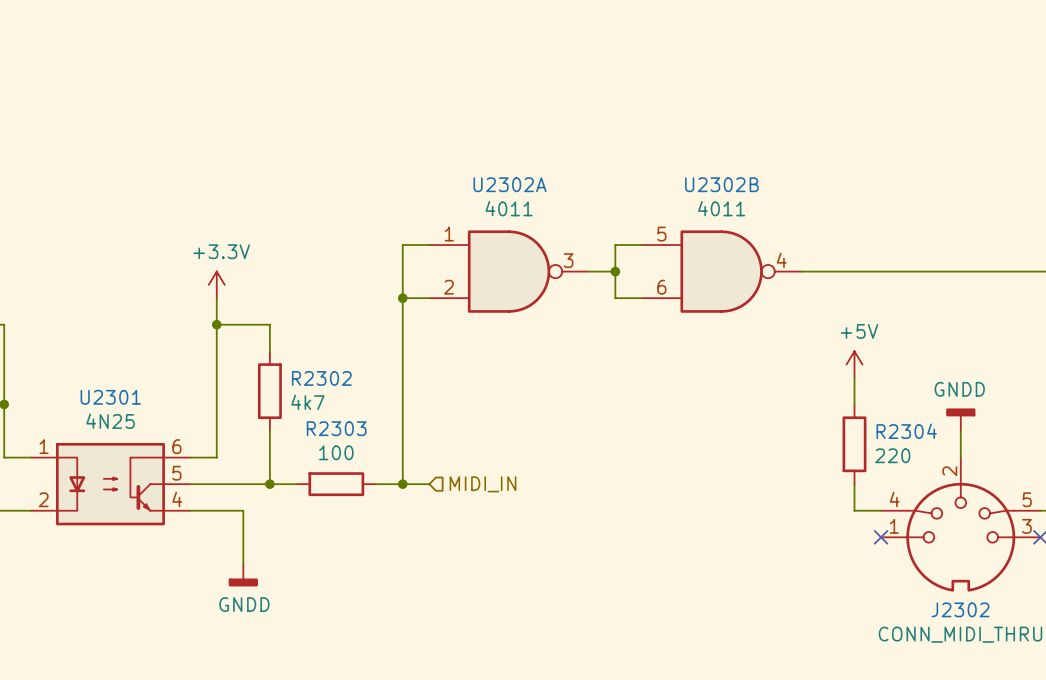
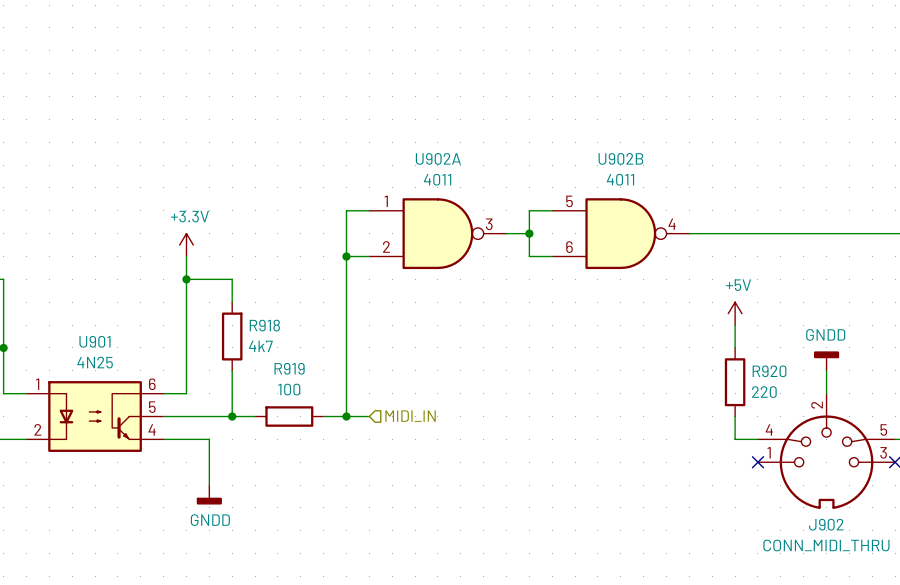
U2302A name: U2302A (510, 184) -> U902A (438, 158)
U2302B name: U2302B (721, 184) -> U902B (620, 158)
R2302 name: R2302 (321, 378) -> R918 (264, 325)
U2301 name: U2301 (110, 397) -> U901 (94, 341)
R2303 name: R2303 (336, 428) -> R919 (289, 368)
R2304 name: R2304 (906, 431) -> R920 (769, 371)
J2302 name: J2302 (960, 609) -> J902 (826, 524)

